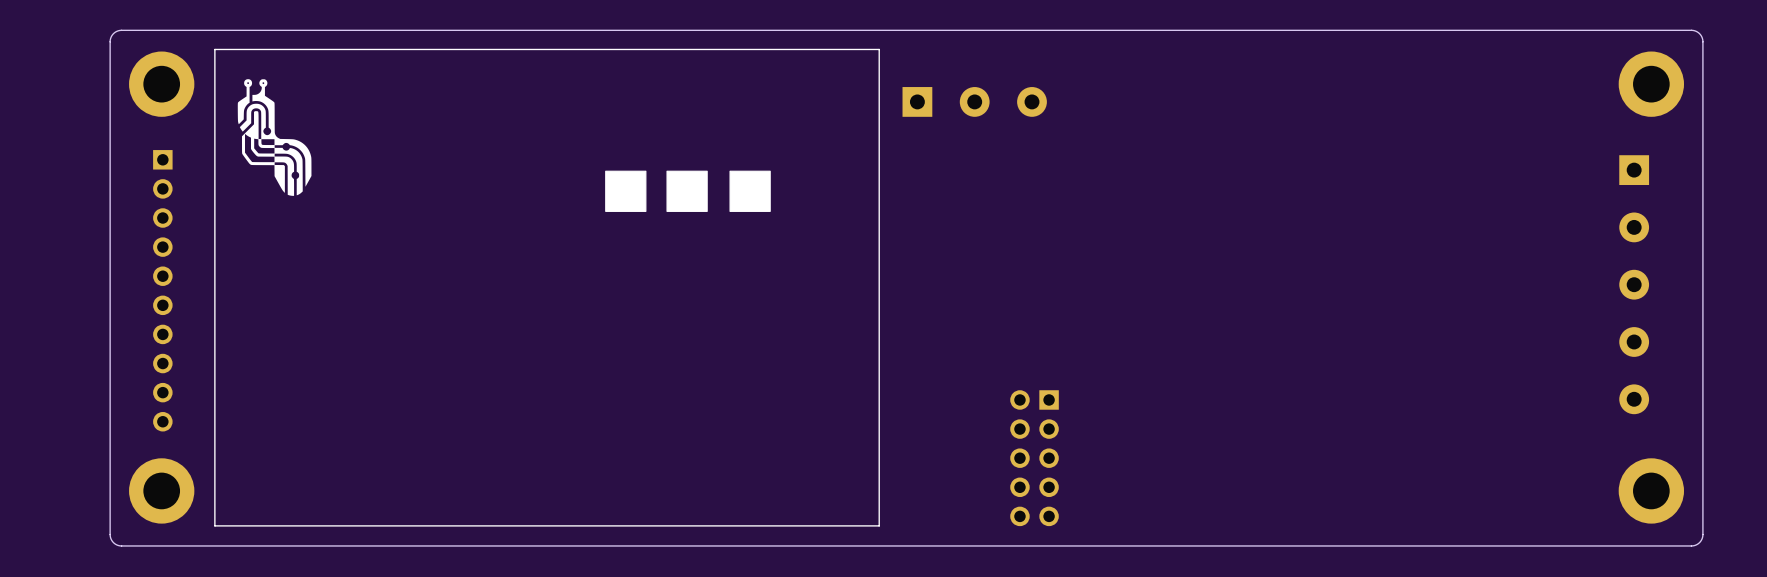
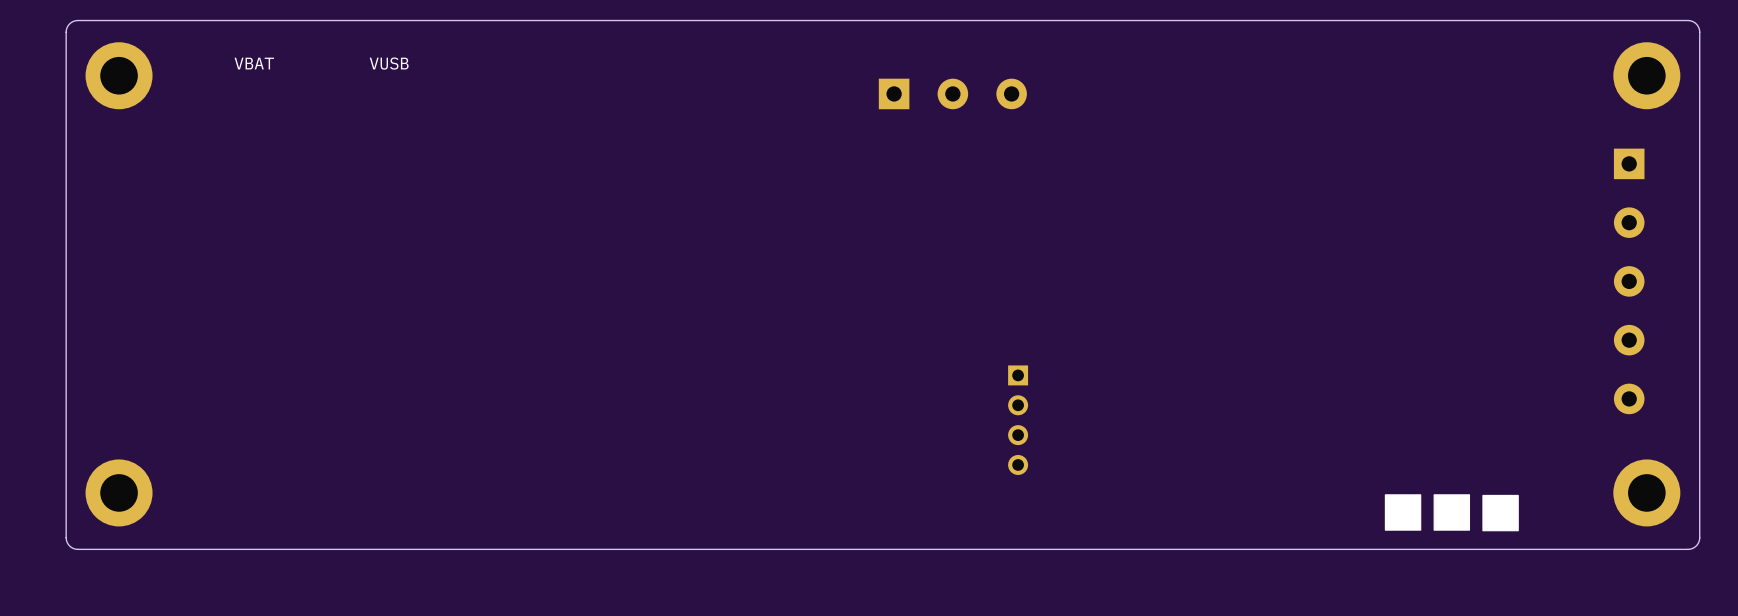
line: (879, 49) (214, 49) (214, 525) (879, 525) (879, 49) -> none
text: none -> VBAT (254, 63)
text: none -> VUSB (389, 63)
drawing: [237, 79, 312, 196] -> none
drawing: [605, 170, 647, 212] -> none
drawing: [666, 170, 708, 212] -> none
drawing: [729, 170, 771, 212] -> none
part: (162, 290) -> none
part: none -> (1018, 420)
part: (1034, 458) -> none
drawing: none -> [1384, 494, 1519, 532]

